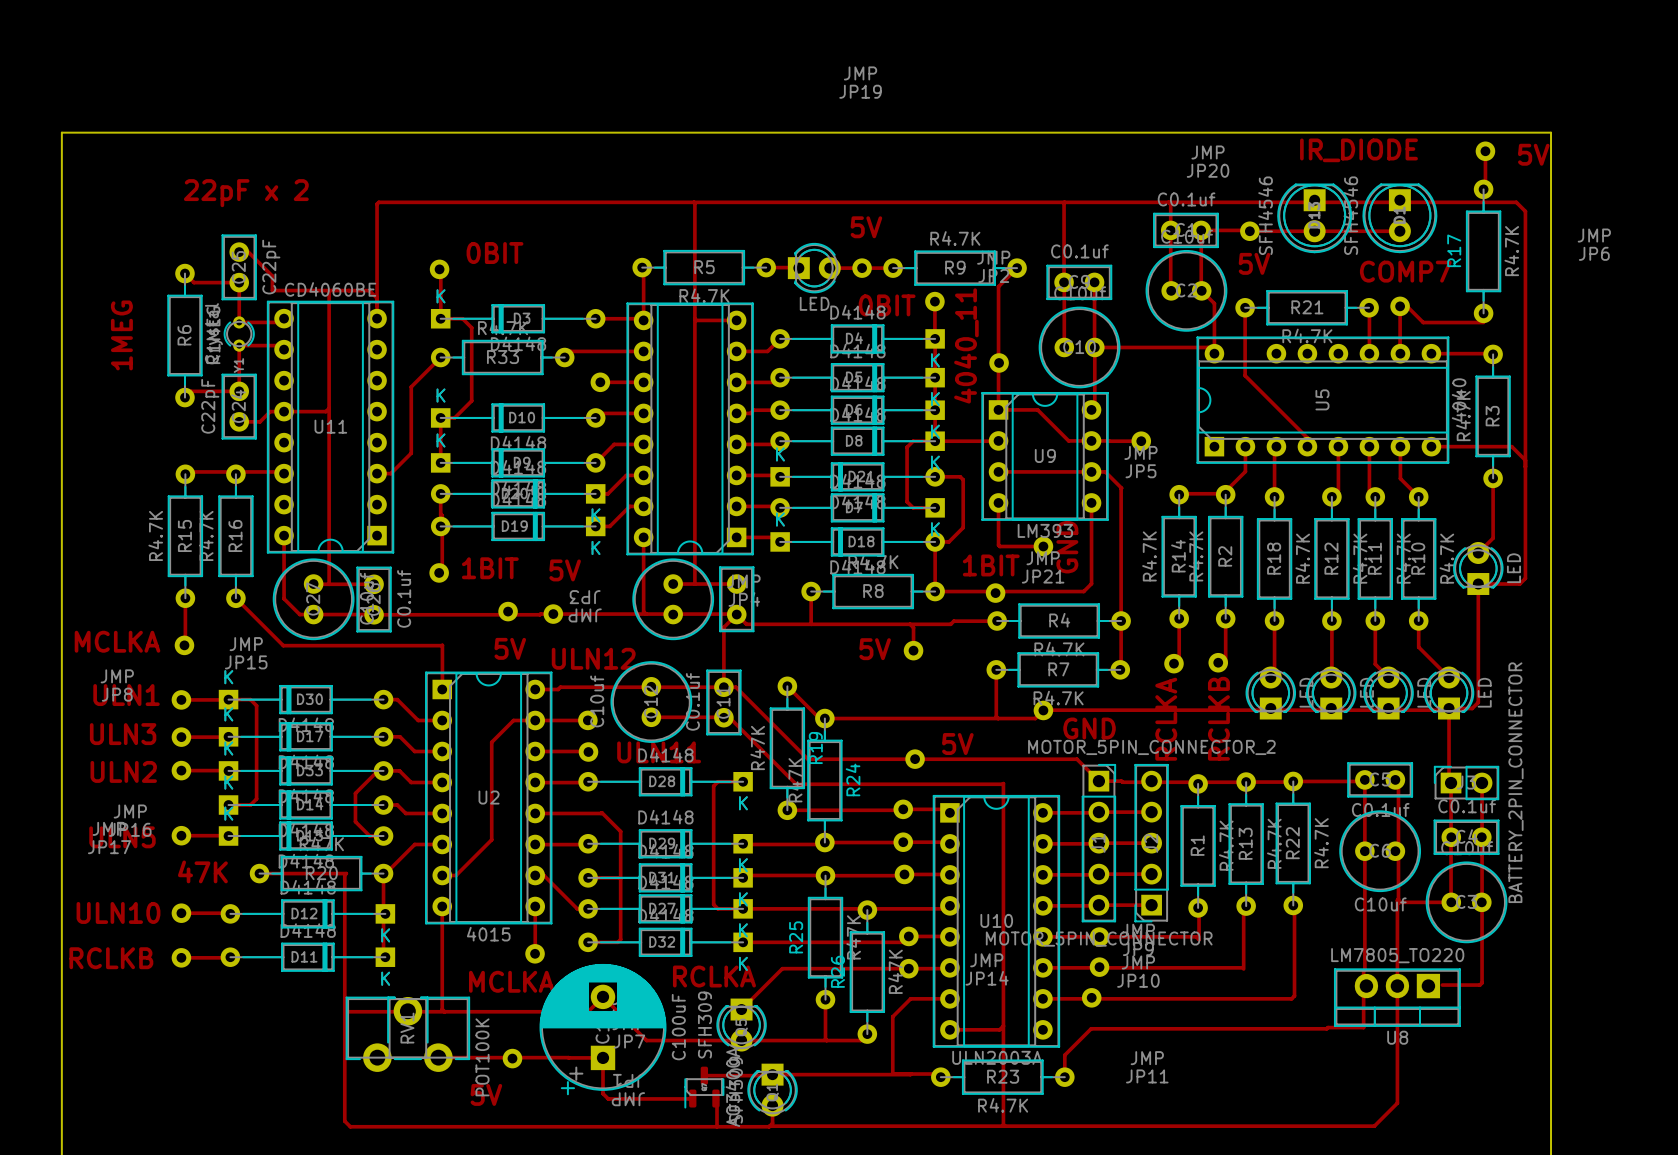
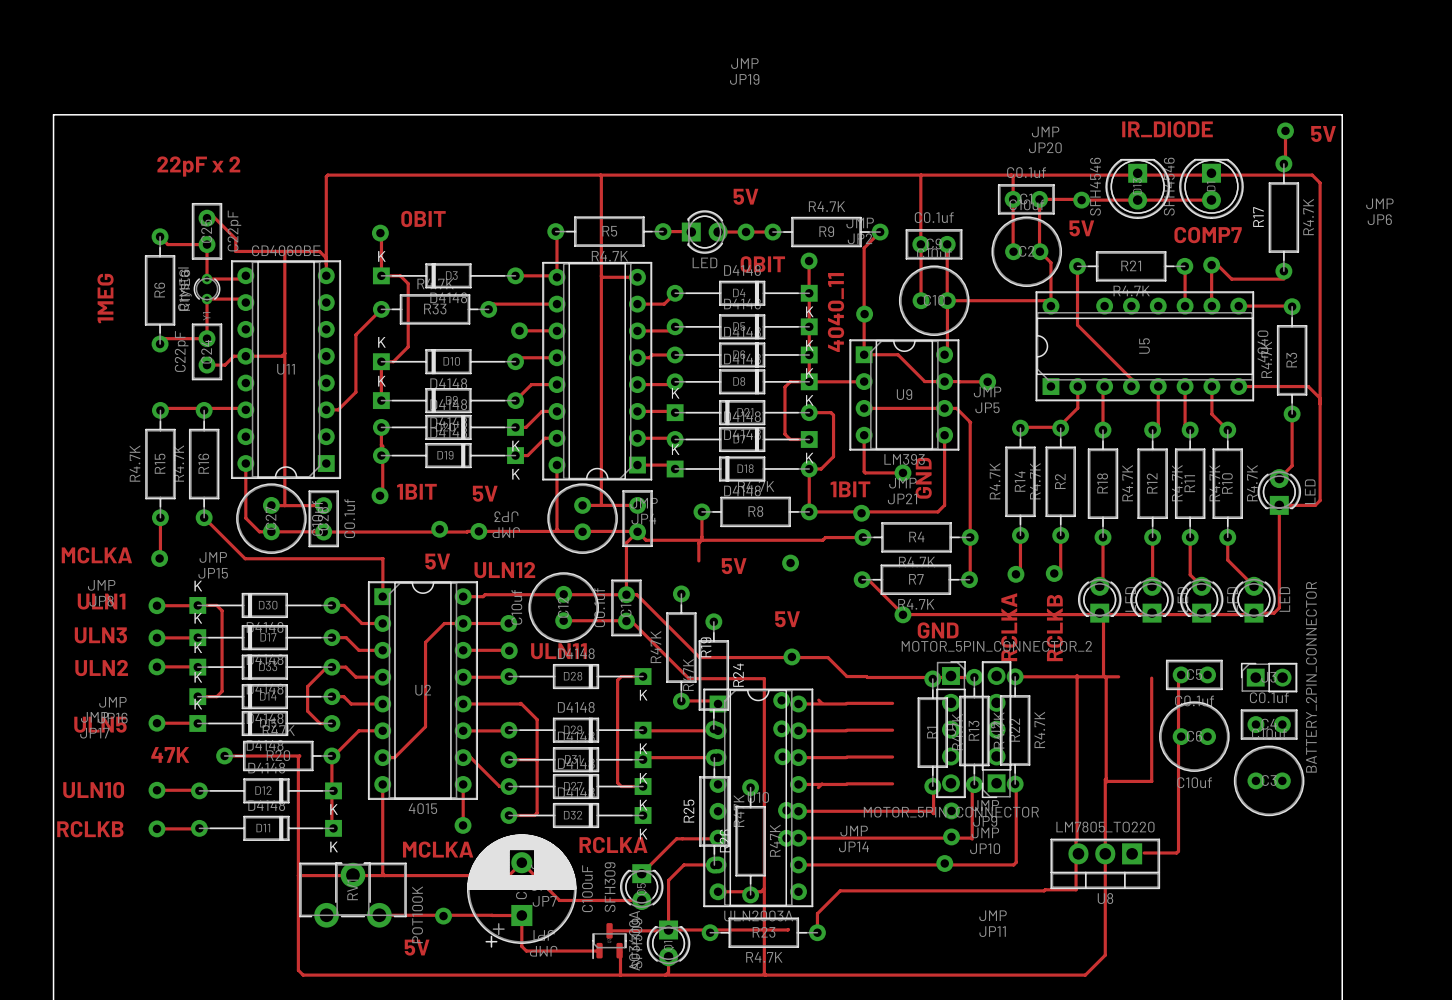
top track: none -> (701, 540) (698, 543) (698, 560)
top track: (910, 624) (913, 627) (913, 650) -> none
text position: 5V (875, 649) -> 5V (734, 566)
top track: (996, 669) (996, 716) (998, 718) -> none
top track: (787, 686) (819, 718) (1035, 718) (1043, 710) -> (868, 579) (903, 614)
top track: (1449, 708) (1451, 902) -> none
top track: none -> (1103, 616) (1103, 675) (1106, 678) (1106, 782) (1151, 781)
text position: 5V (957, 744) -> 5V (787, 619)
top track: (808, 759) (1076, 759) (1098, 781) (1245, 782) -> (699, 657) (827, 657) (846, 676) (973, 677)
top track: (1364, 779) (1363, 1027) (1091, 1028) (1064, 1055) (1064, 1077) -> (1077, 675) (1076, 889) (840, 890) (817, 913) (817, 932)
top track: (1395, 779) (1398, 783) (1398, 903) (1451, 902) -> none
top track: (1293, 781) (1363, 781) -> (1015, 676) (1075, 676)
top track: none -> (1151, 678) (1151, 781)
top track: (1482, 783) (1482, 982) (1479, 985) (1442, 985) -> (1178, 678) (1178, 851) (1176, 852) (1144, 852)
top track: (883, 784) (1003, 783) (1003, 1124) (1004, 1126) -> (764, 678) (765, 975)
top track: (903, 809) (787, 810) -> none
top track: (908, 809) (946, 809) -> (682, 700) (715, 700)
top track: (1042, 812) (1098, 812) -> (798, 703) (846, 703)
top track: (1098, 812) (1151, 812) -> (846, 703) (892, 703)
top track: (824, 842) (948, 842) (949, 843) -> none
top track: (1042, 843) (1098, 843) -> (798, 730) (846, 730)
top track: (1098, 843) (1151, 843) -> (846, 730) (892, 730)
R22 position: (1293, 843) -> (1015, 730)
R13 position: (1246, 844) -> (974, 730)
R1 position: (1198, 845) -> (932, 732)
top track: (949, 874) (825, 875) -> none
top track: (1042, 874) (1098, 874) -> (798, 757) (846, 757)
top track: (1098, 874) (1151, 874) -> (846, 757) (892, 757)
top track: none -> (1106, 778) (1105, 955) (1085, 975) (665, 975)
top track: (1398, 899) (1397, 1103) (1374, 1126) (769, 1126) -> none
top track: (1042, 905) (1098, 905) -> (798, 784) (846, 784)
top track: (1098, 905) (1151, 905) -> (846, 783) (892, 783)
top track: (1294, 906) (1294, 995) (1291, 998) (1042, 998) -> (1016, 785) (1016, 862) (1013, 864) (798, 864)
top track: (743, 908) (946, 908) -> none
top track: (1199, 908) (1199, 939) (1196, 936) (1042, 936) -> (933, 787) (933, 813) (931, 811) (798, 811)
top track: (1243, 908) (1243, 968) -> (972, 786) (972, 839)
U10 position: (996, 921) -> (758, 797)
top track: (949, 936) (908, 936) (902, 942) (743, 942) -> none
top track: (949, 967) (781, 969) -> (718, 838) (676, 838)
top track: (1042, 967) (1242, 967) -> (798, 838) (971, 838)
U8 position: (1397, 997) -> (1105, 863)
top track: (949, 998) (910, 998) (892, 1016) (892, 1074) (937, 1074) (940, 1077) -> none
top track: (825, 999) (826, 1040) -> none
top track: none -> (718, 864) (684, 864) (668, 880) (668, 929)
top track: (1003, 1026) (999, 1029) (949, 1029) -> (764, 888) (761, 891) (718, 891)
top track: (867, 1034) (860, 1040) (741, 1040) -> none
R23 position: (1002, 1077) -> (763, 932)

